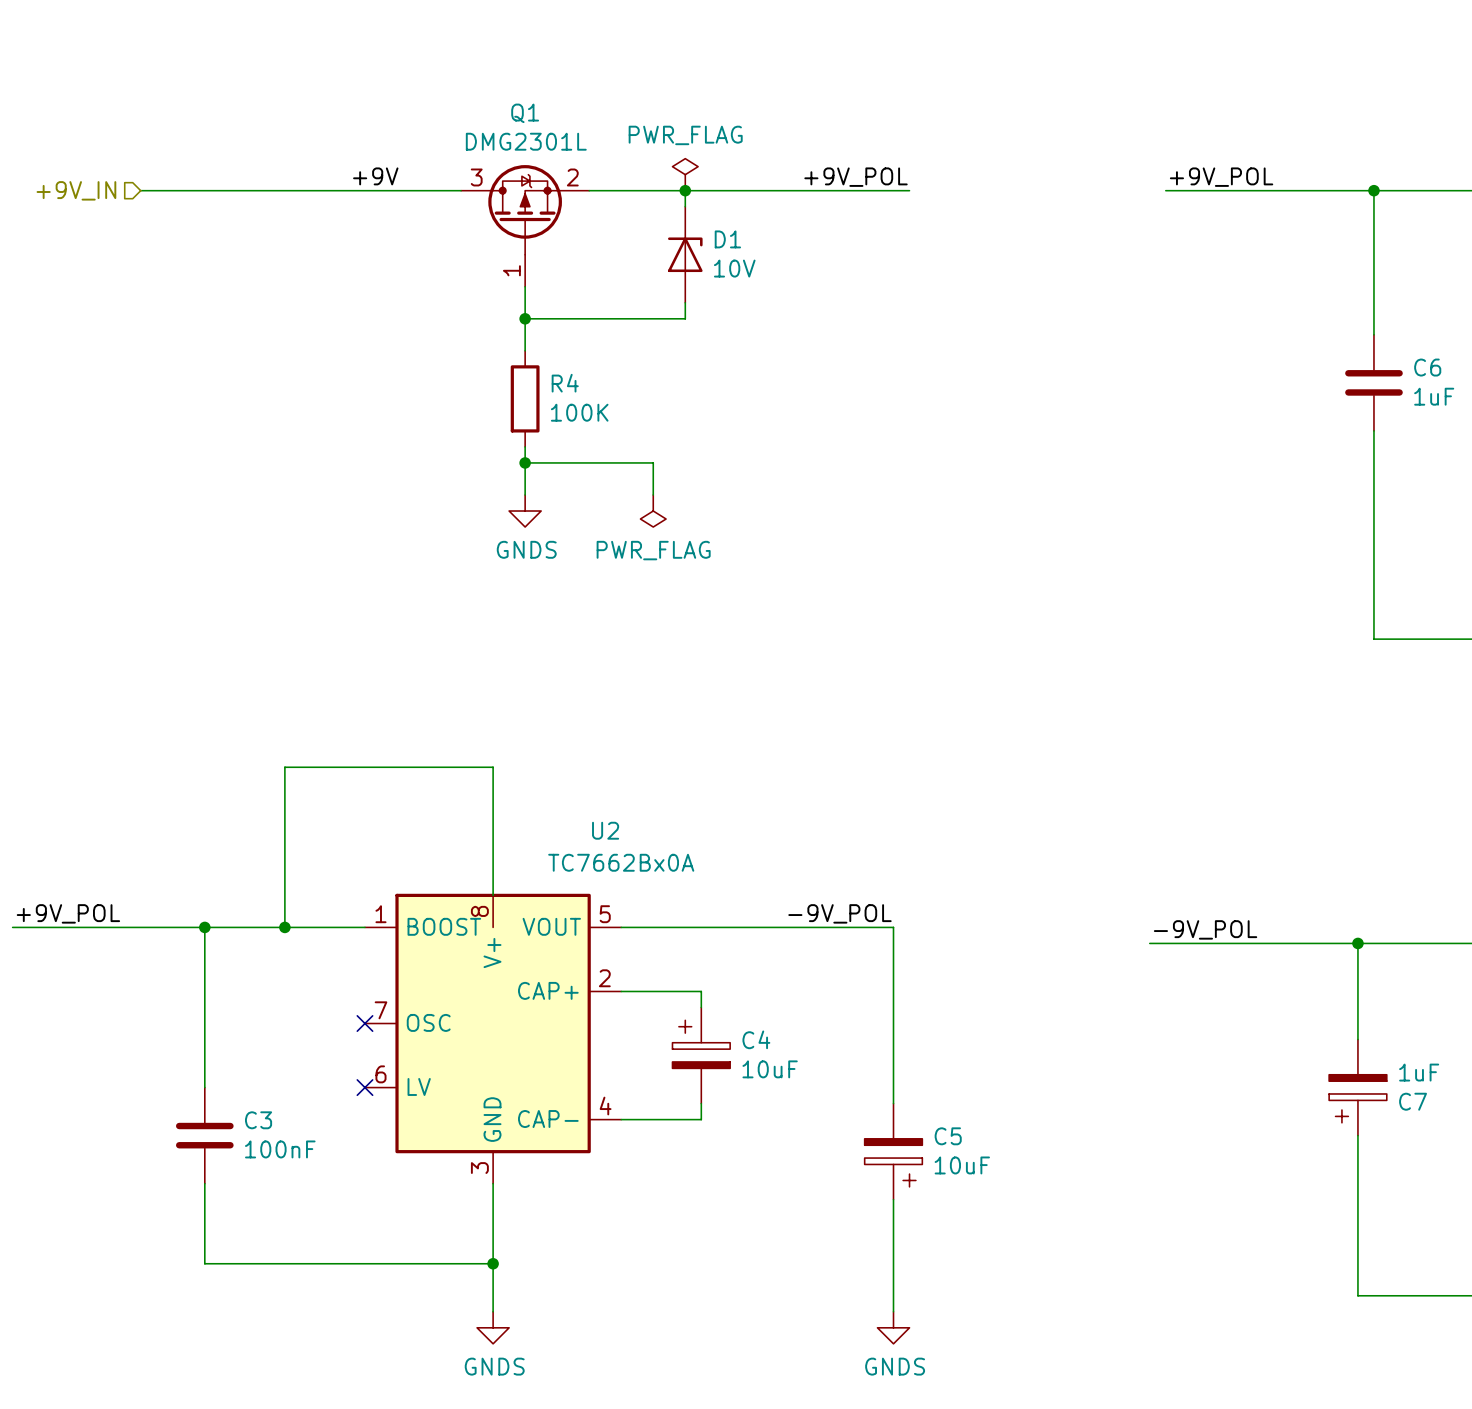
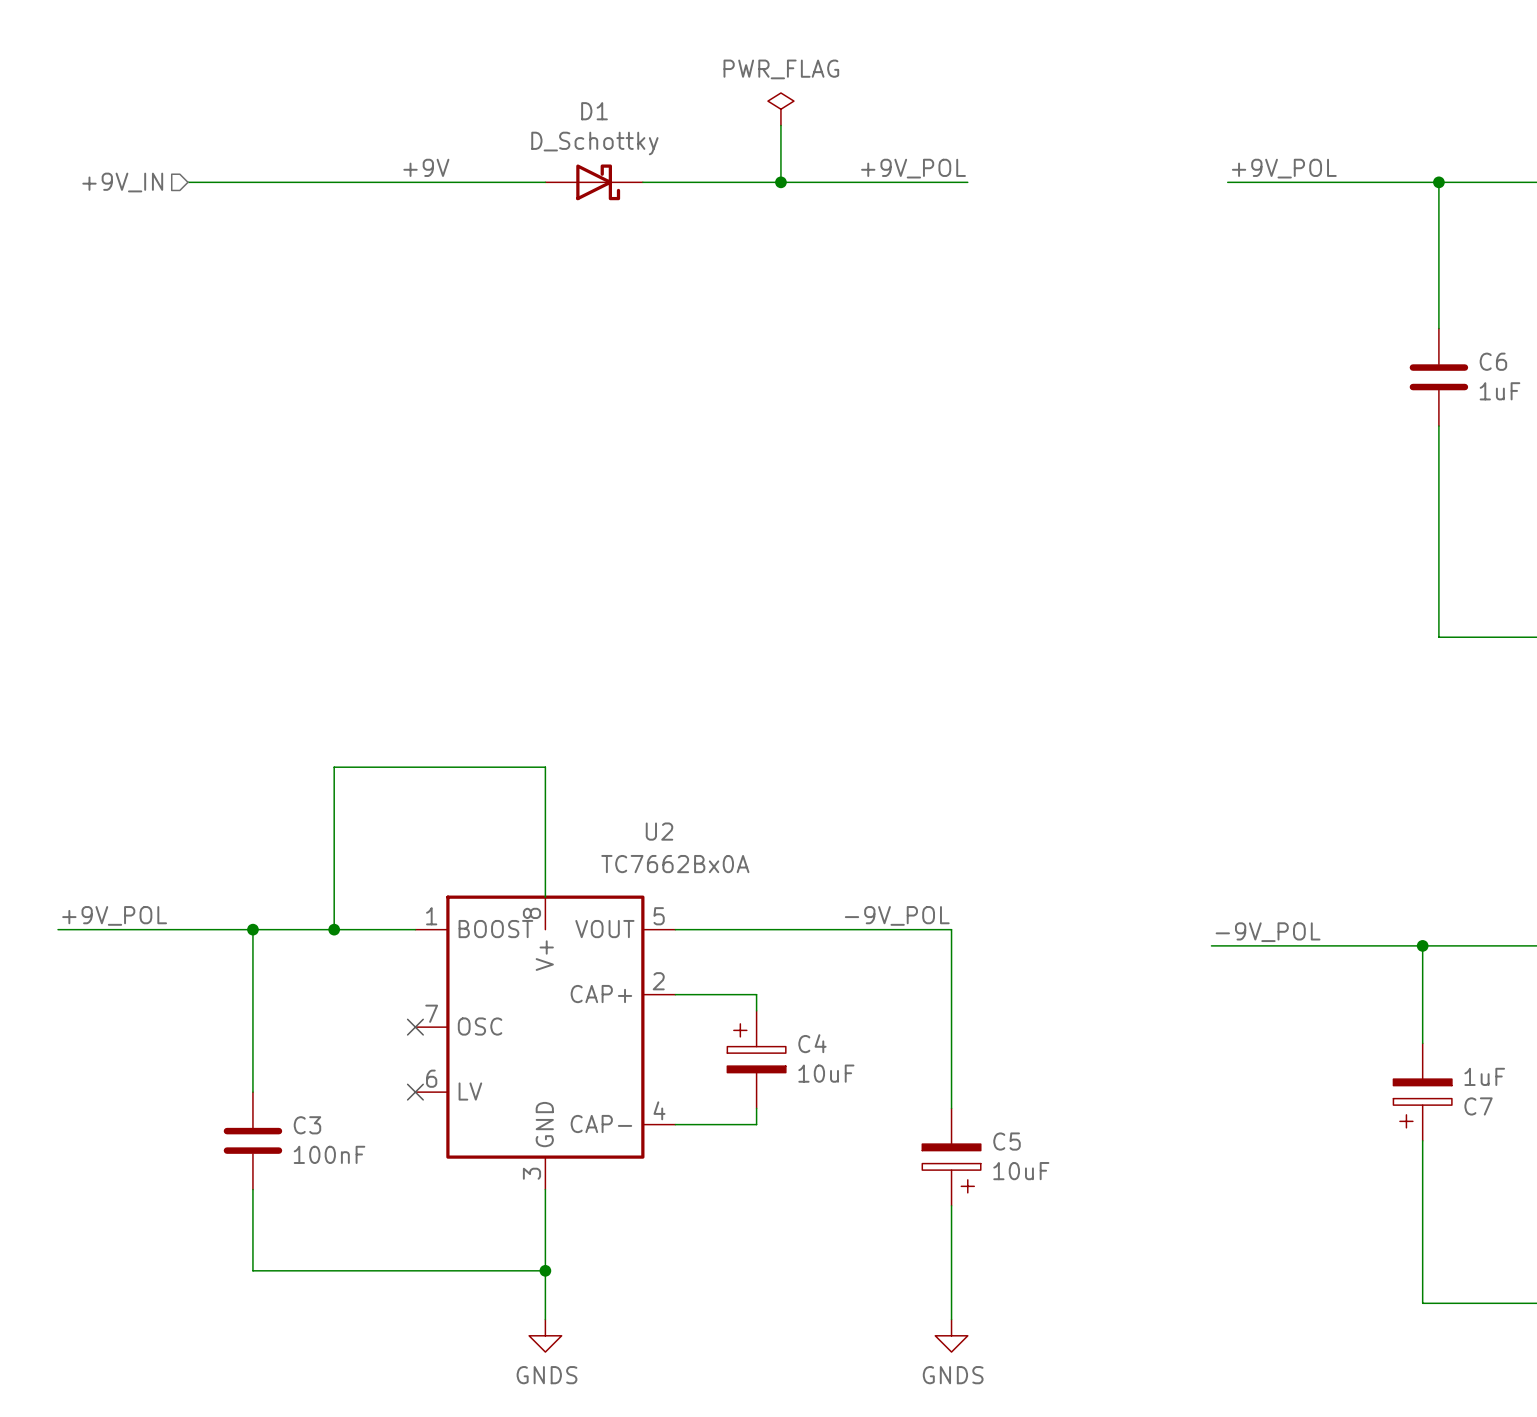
wire: none -> (780, 125) (780, 182)
power symbol position: PWR_FLAG (685, 174) -> PWR_FLAG (780, 109)
wire: (685, 190) (685, 206) -> none
junction position: (685, 190) -> (780, 182)
D1 symbol: [667, 206, 703, 303] -> [545, 164, 643, 201]
Q1: DMG2301L (525, 225) -> none
D1 name position: D1 (727, 239) -> D1 (594, 111)
D1 value: 10V (734, 268) -> D_Schottky (594, 143)
wire: (525, 286) (525, 350) -> none
wire: (685, 302) (685, 318) (525, 318) -> none
junction: (525, 318) -> none
R4: 100K (525, 398) -> none
wire: (525, 446) (525, 494) -> none
wire: (525, 462) (653, 462) (653, 494) -> none
junction: (525, 462) -> none
power symbol: GNDS (525, 511) -> none
power symbol: PWR_FLAG (653, 511) -> none

